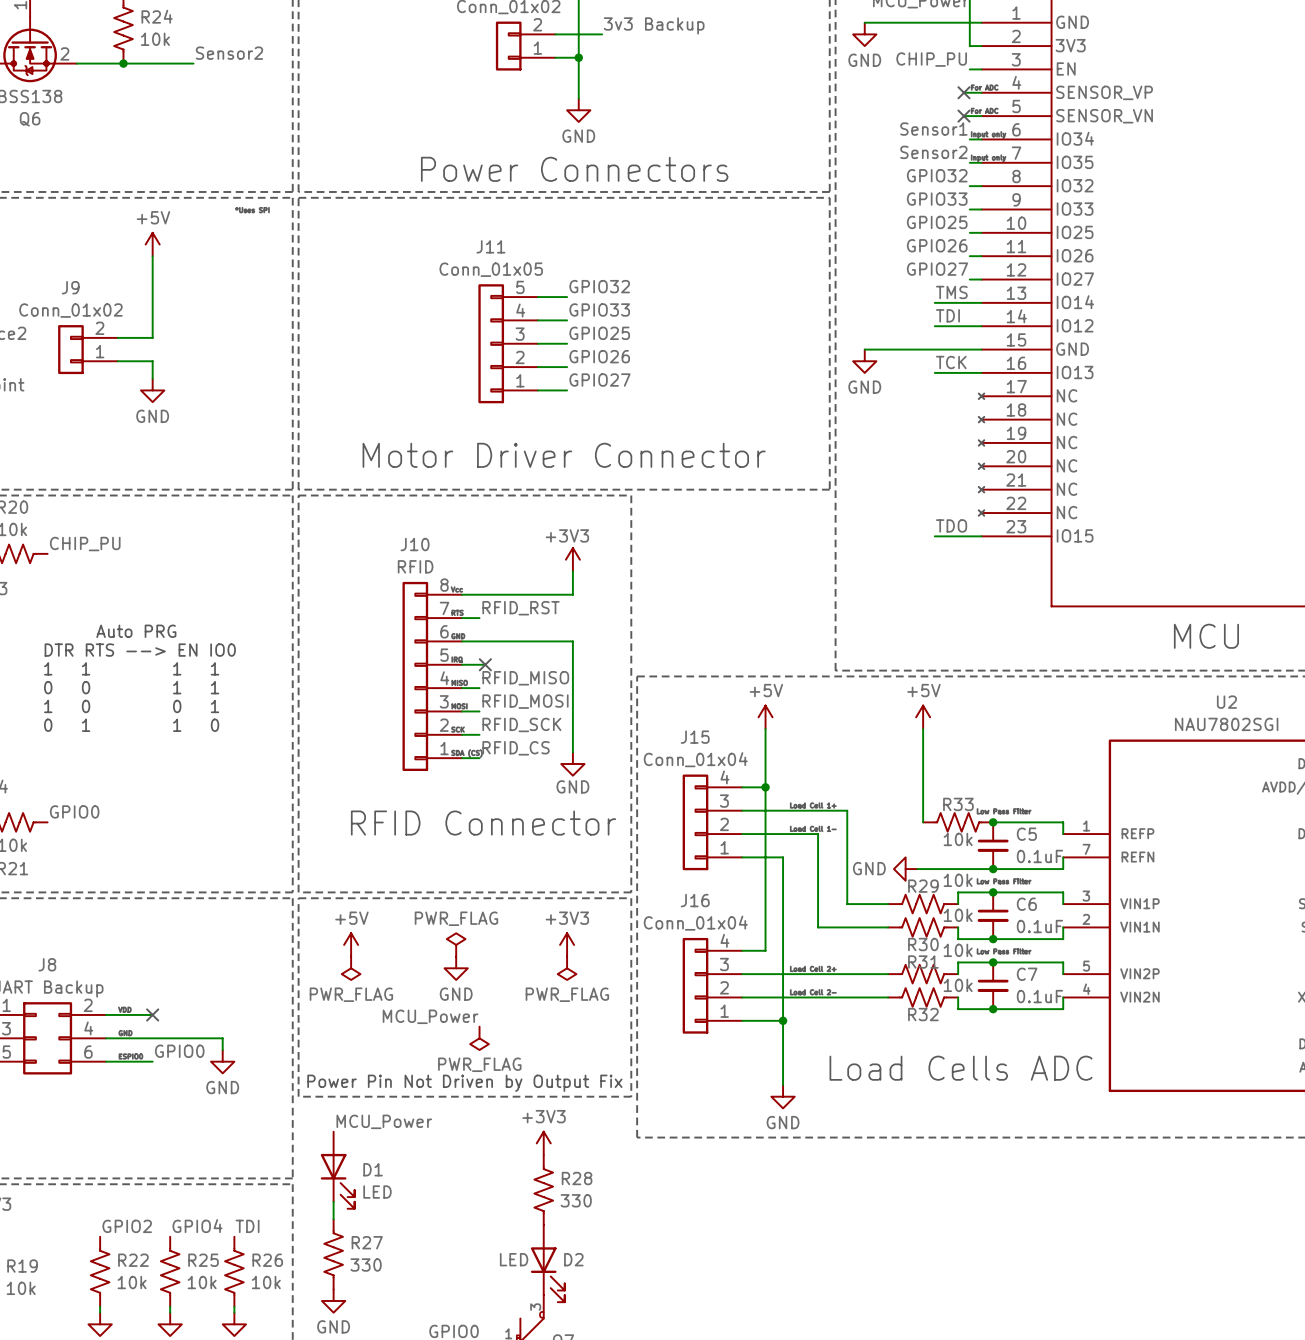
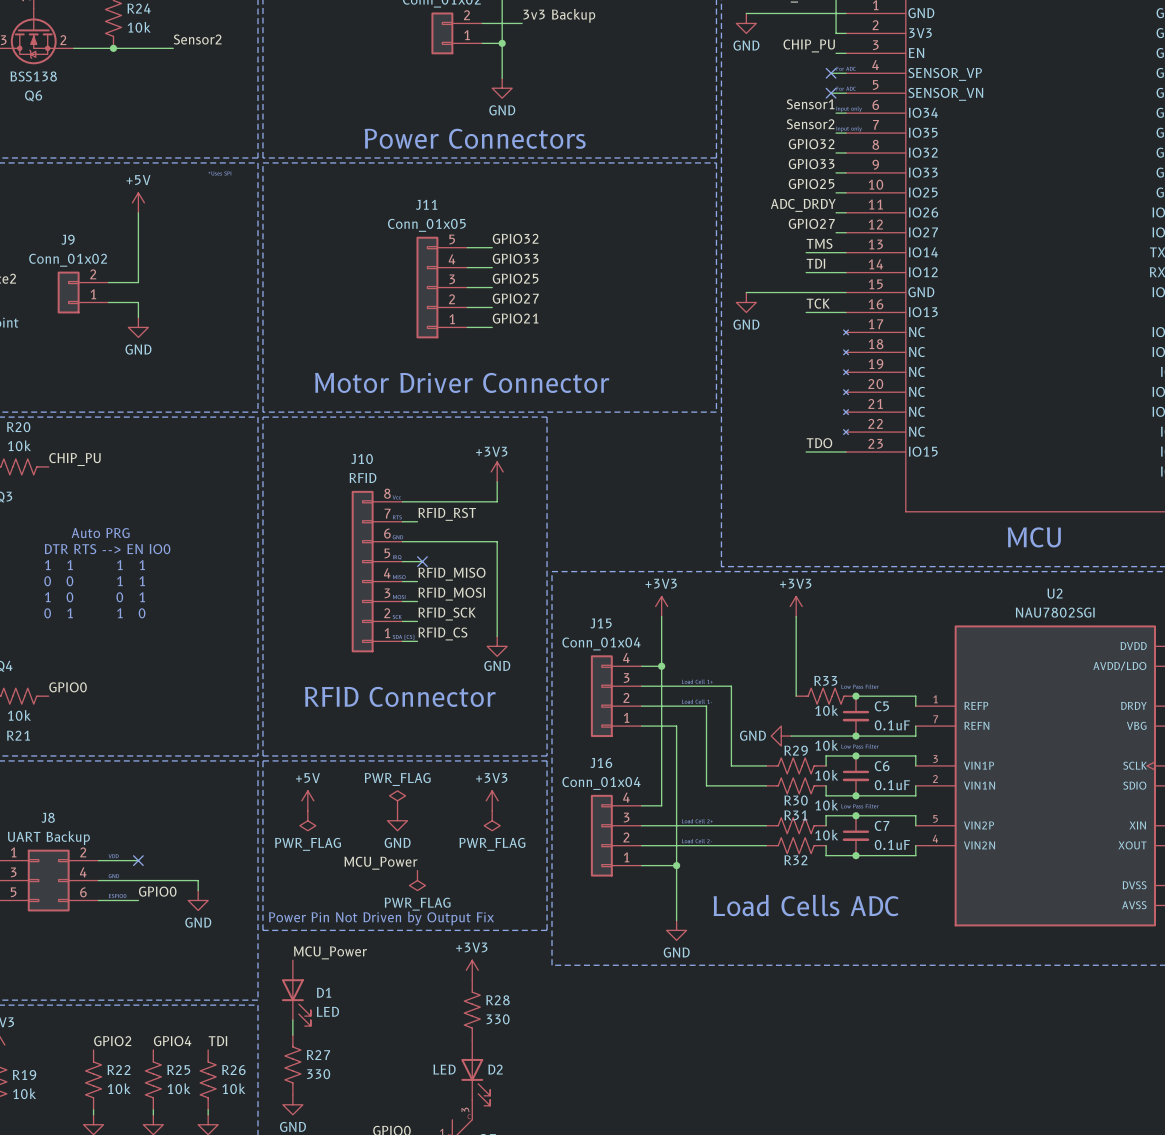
label: GPIO26 (937, 245) -> ADC_DRDY (803, 205)
label: GPIO26 (599, 356) -> GPIO27 (515, 298)
label: GPIO27 (599, 380) -> GPIO21 (515, 318)
power symbol: +5V (765, 717) -> +3V3 (661, 606)
power symbol: +5V (923, 717) -> +3V3 (796, 606)

